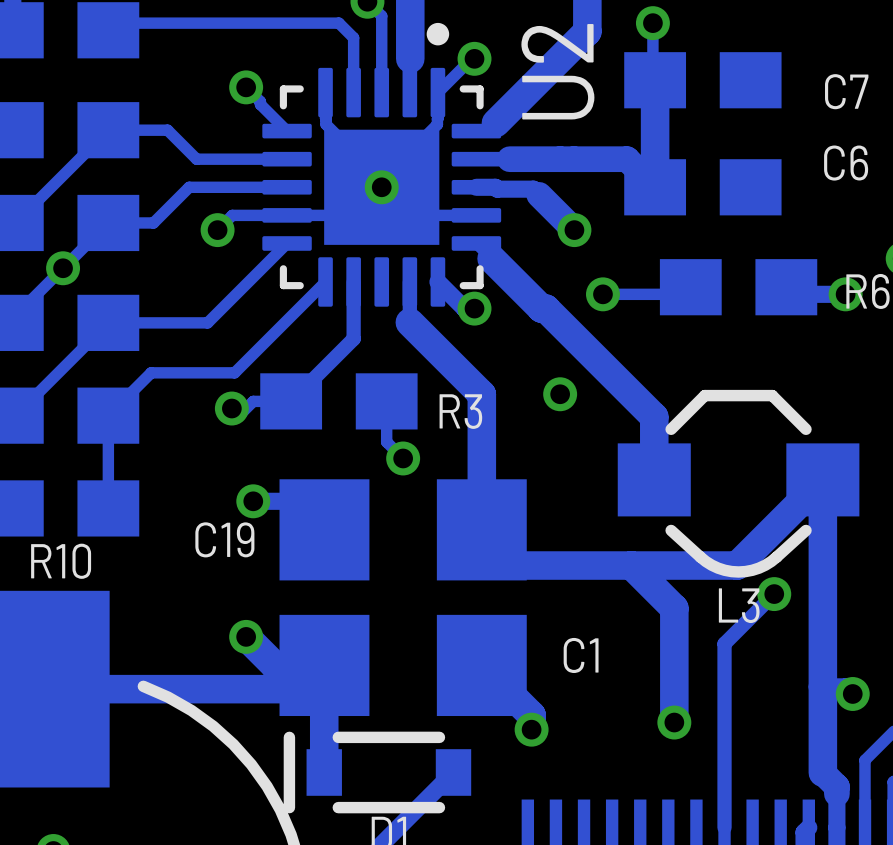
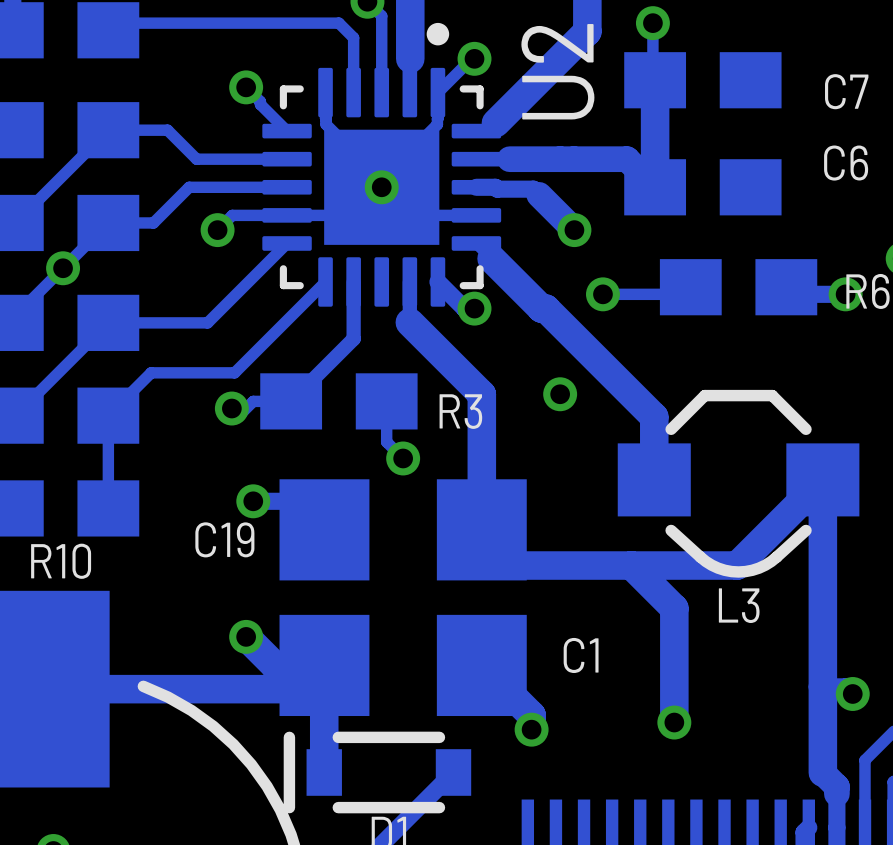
track: (774, 594) (724, 643) (724, 827) -> none
via: (774, 594) -> none

